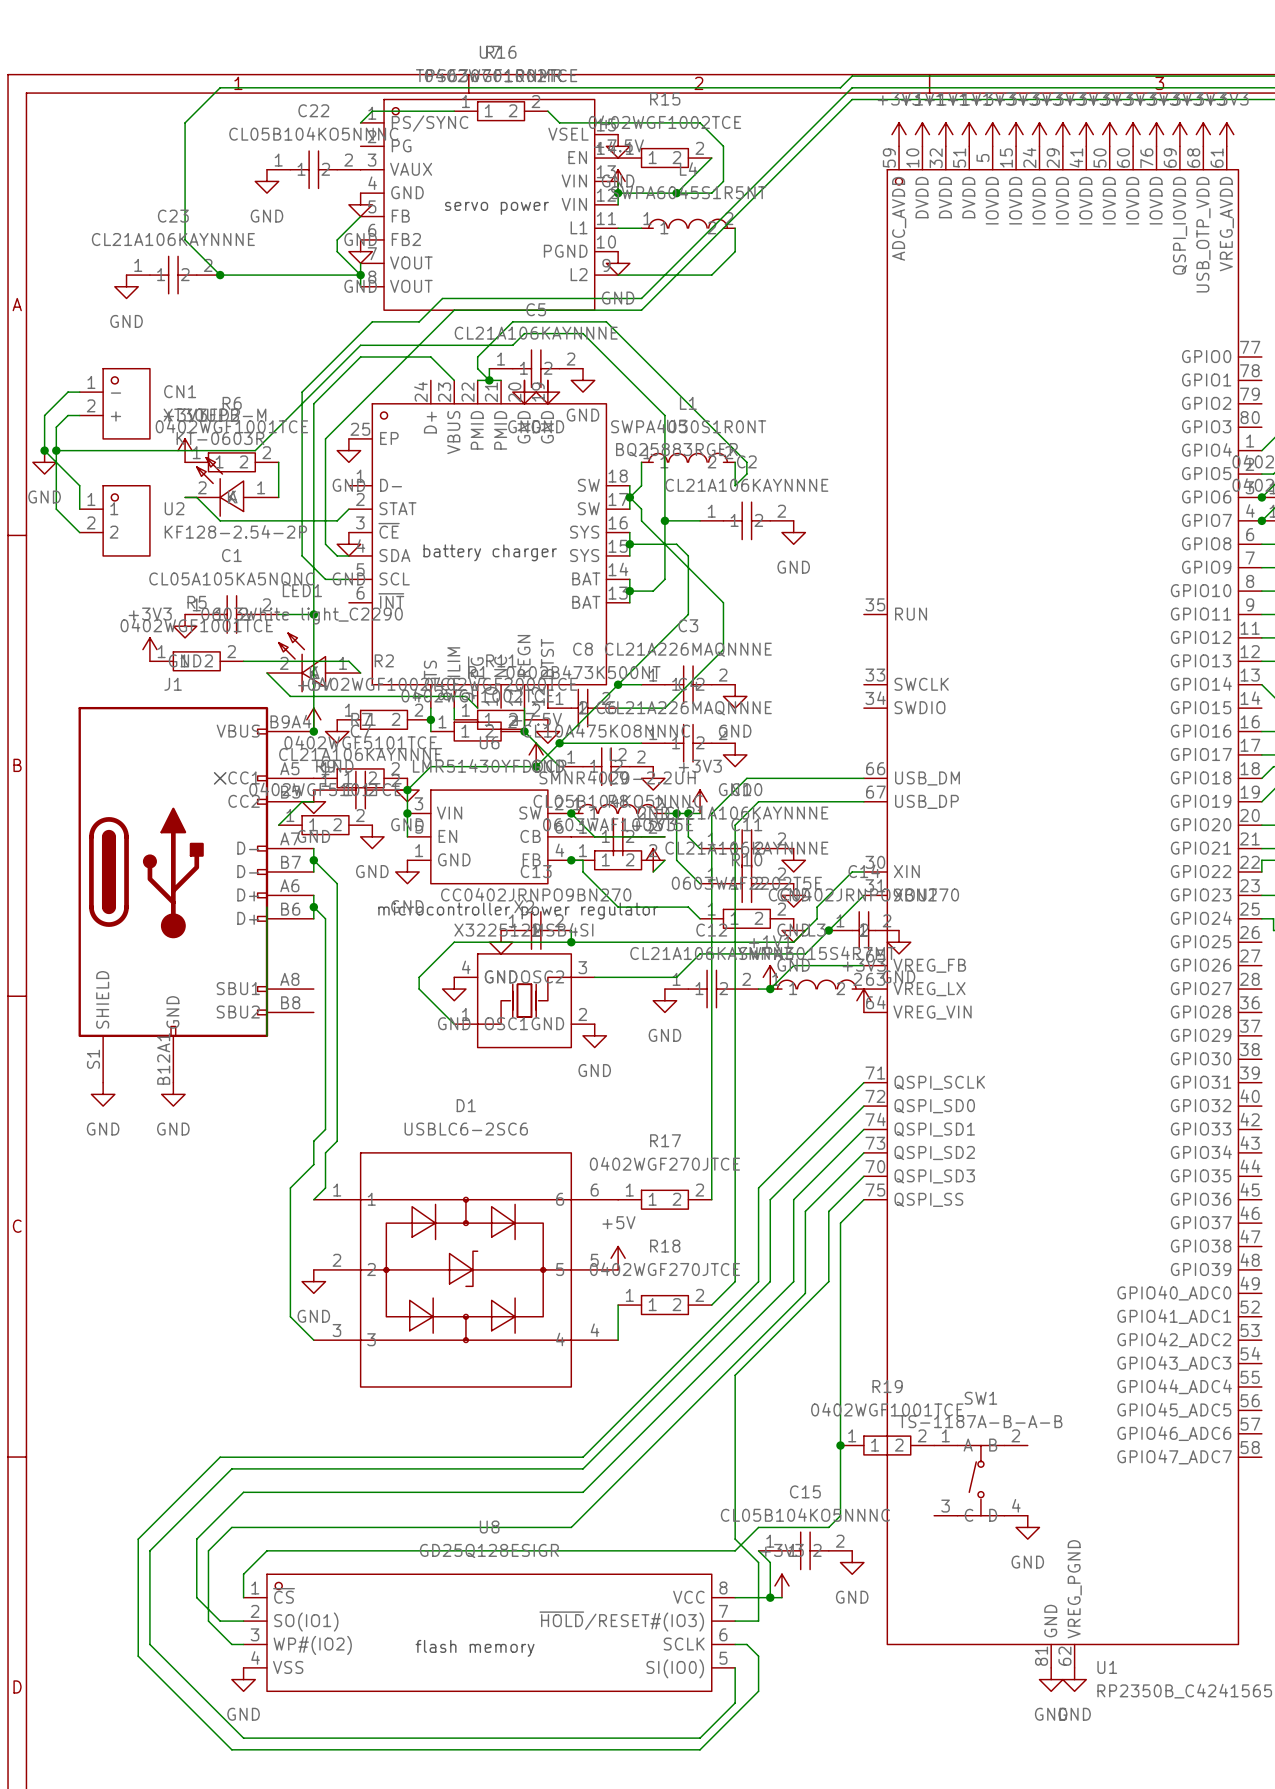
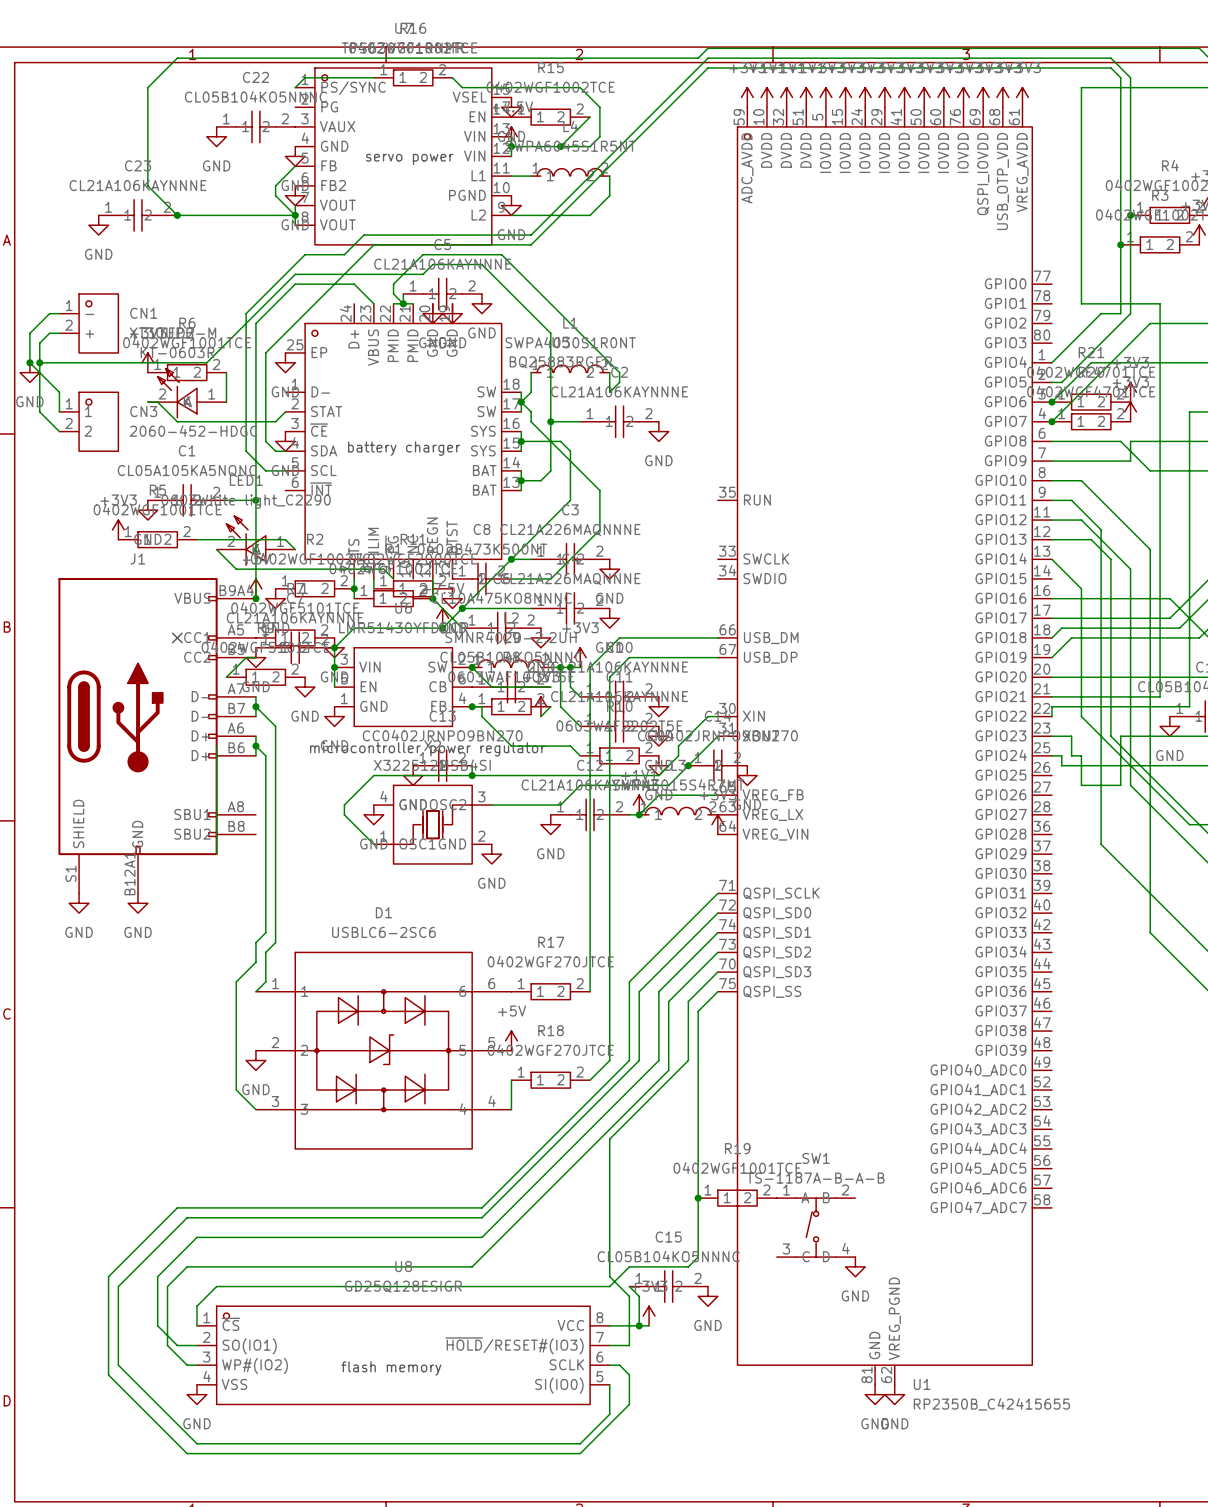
U2 name: U2 (174, 508) -> CN3 (143, 411)
U2 value: KF128-2.54-2P (235, 531) -> 2060-452-HDGC (193, 430)

